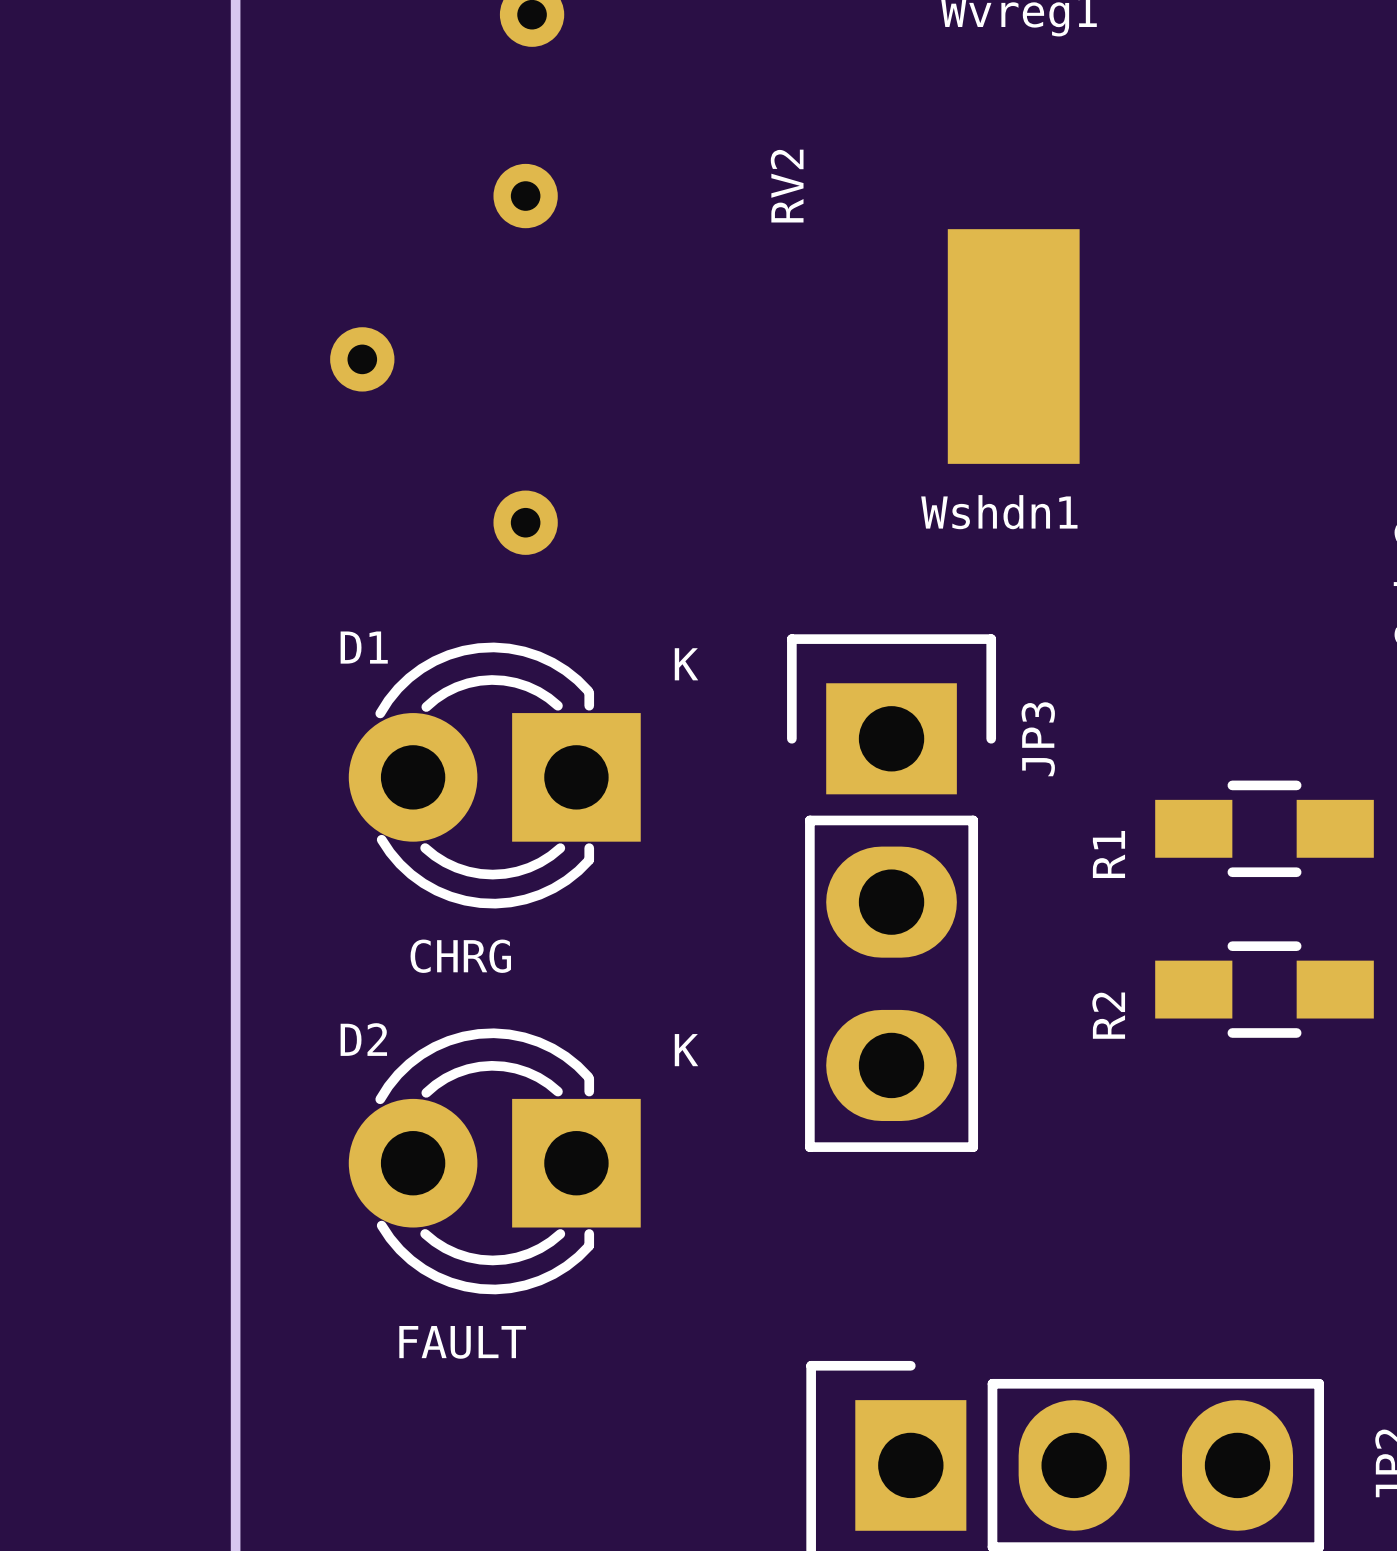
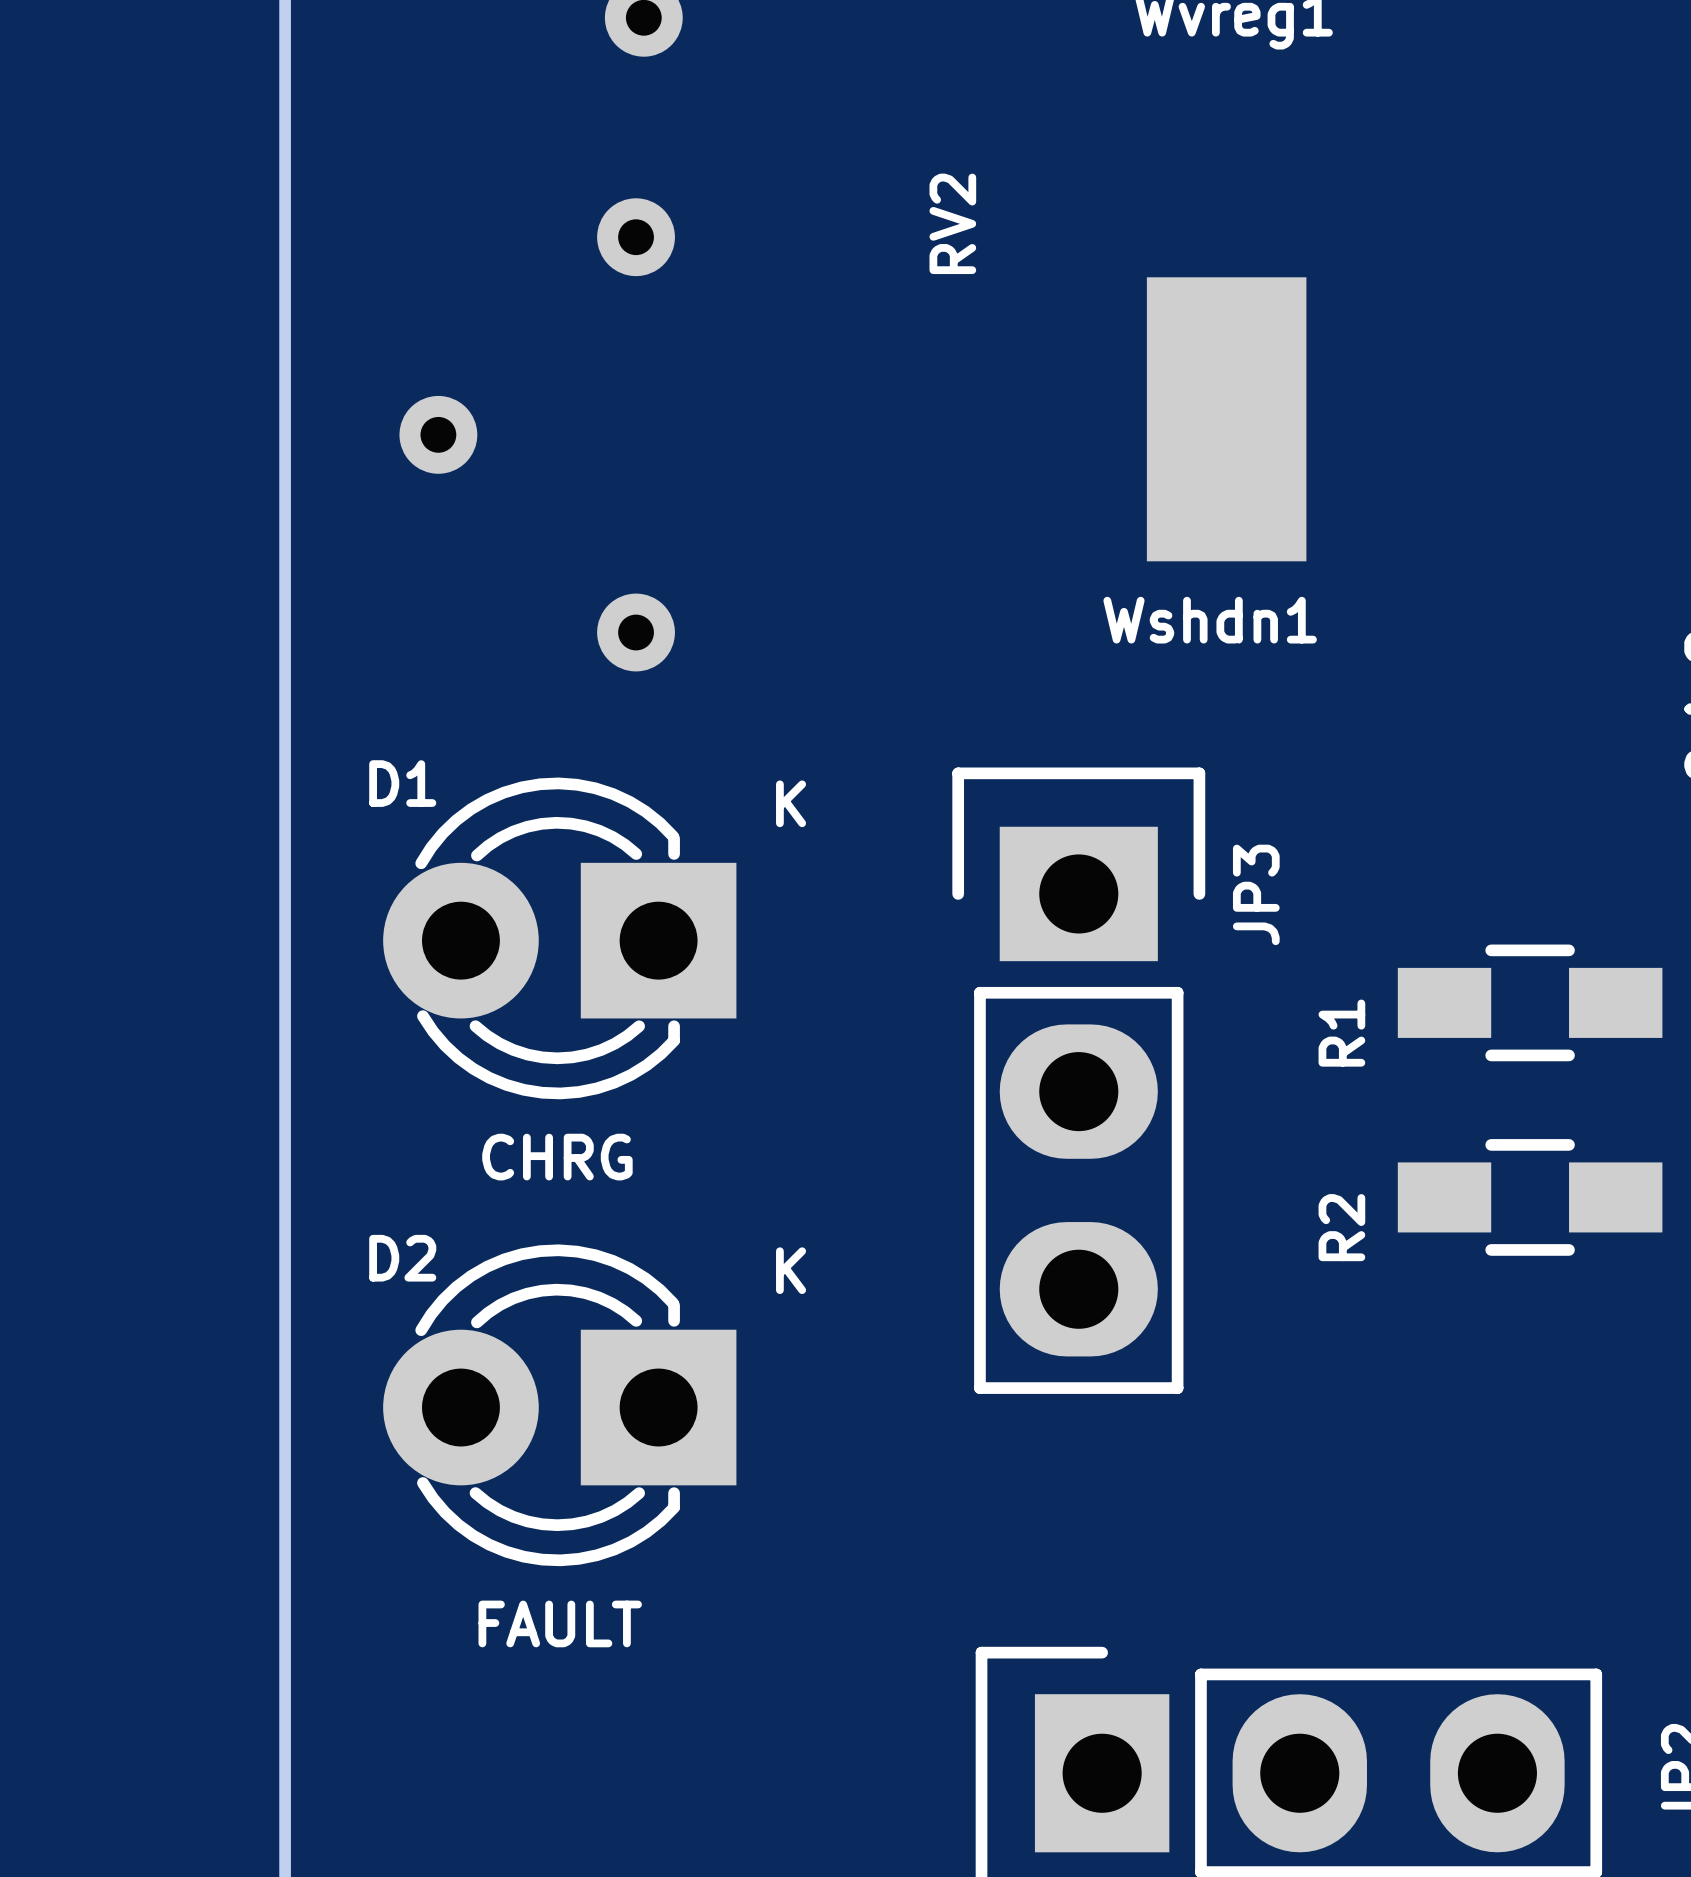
D1 position: (494, 775) -> (559, 938)
D2 position: (494, 1161) -> (559, 1405)

